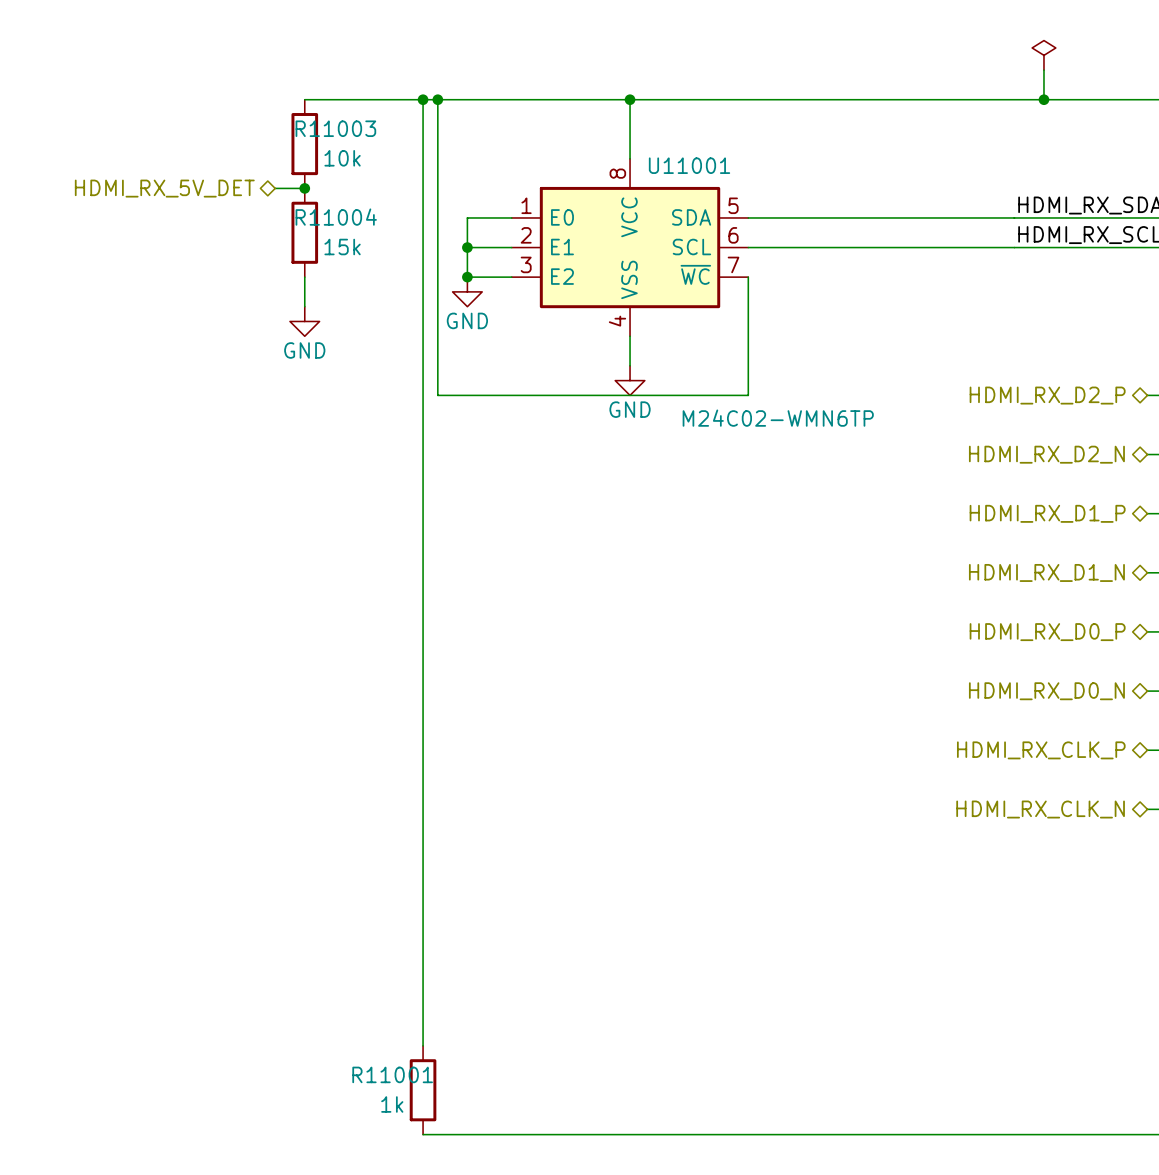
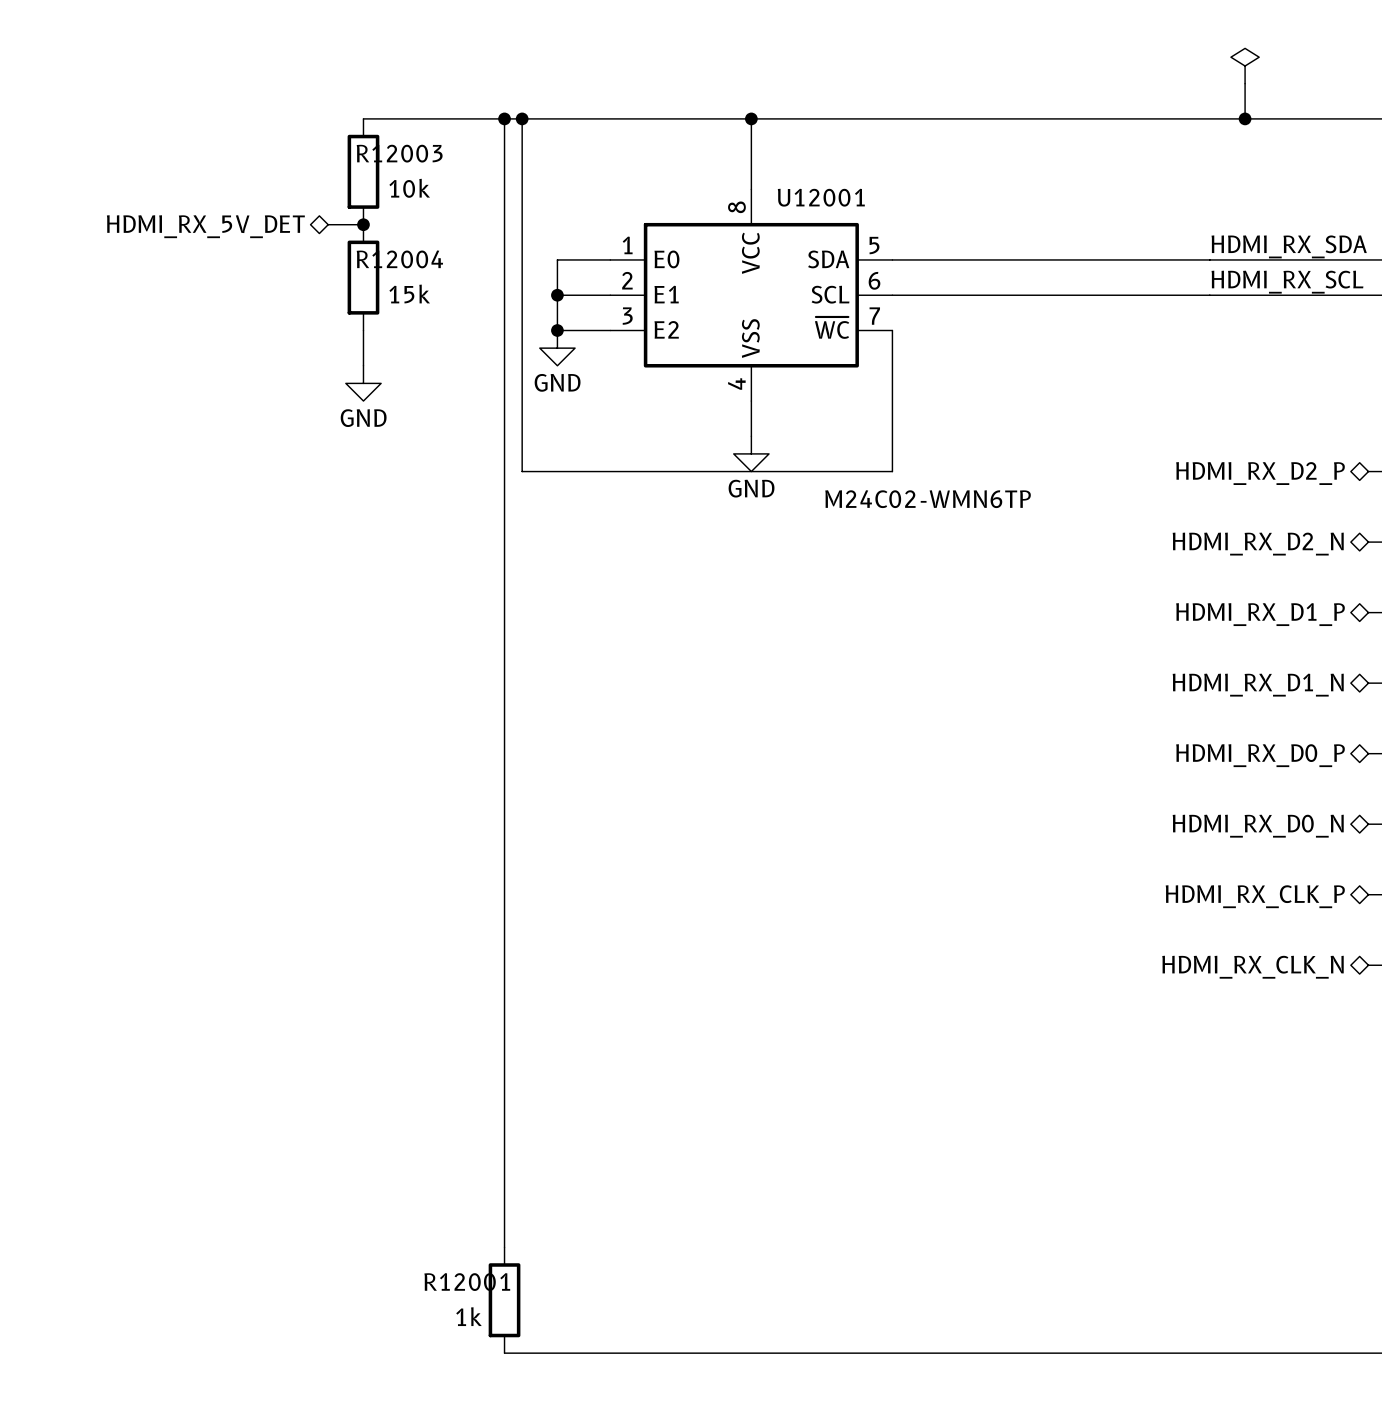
R11003 name: R11003 (335, 128) -> R12003 (399, 153)
U11001 name: U11001 (689, 165) -> U12001 (821, 197)
R11004 name: R11004 (336, 217) -> R12004 (399, 259)
R11001 name: R11001 (392, 1074) -> R12001 (467, 1282)

